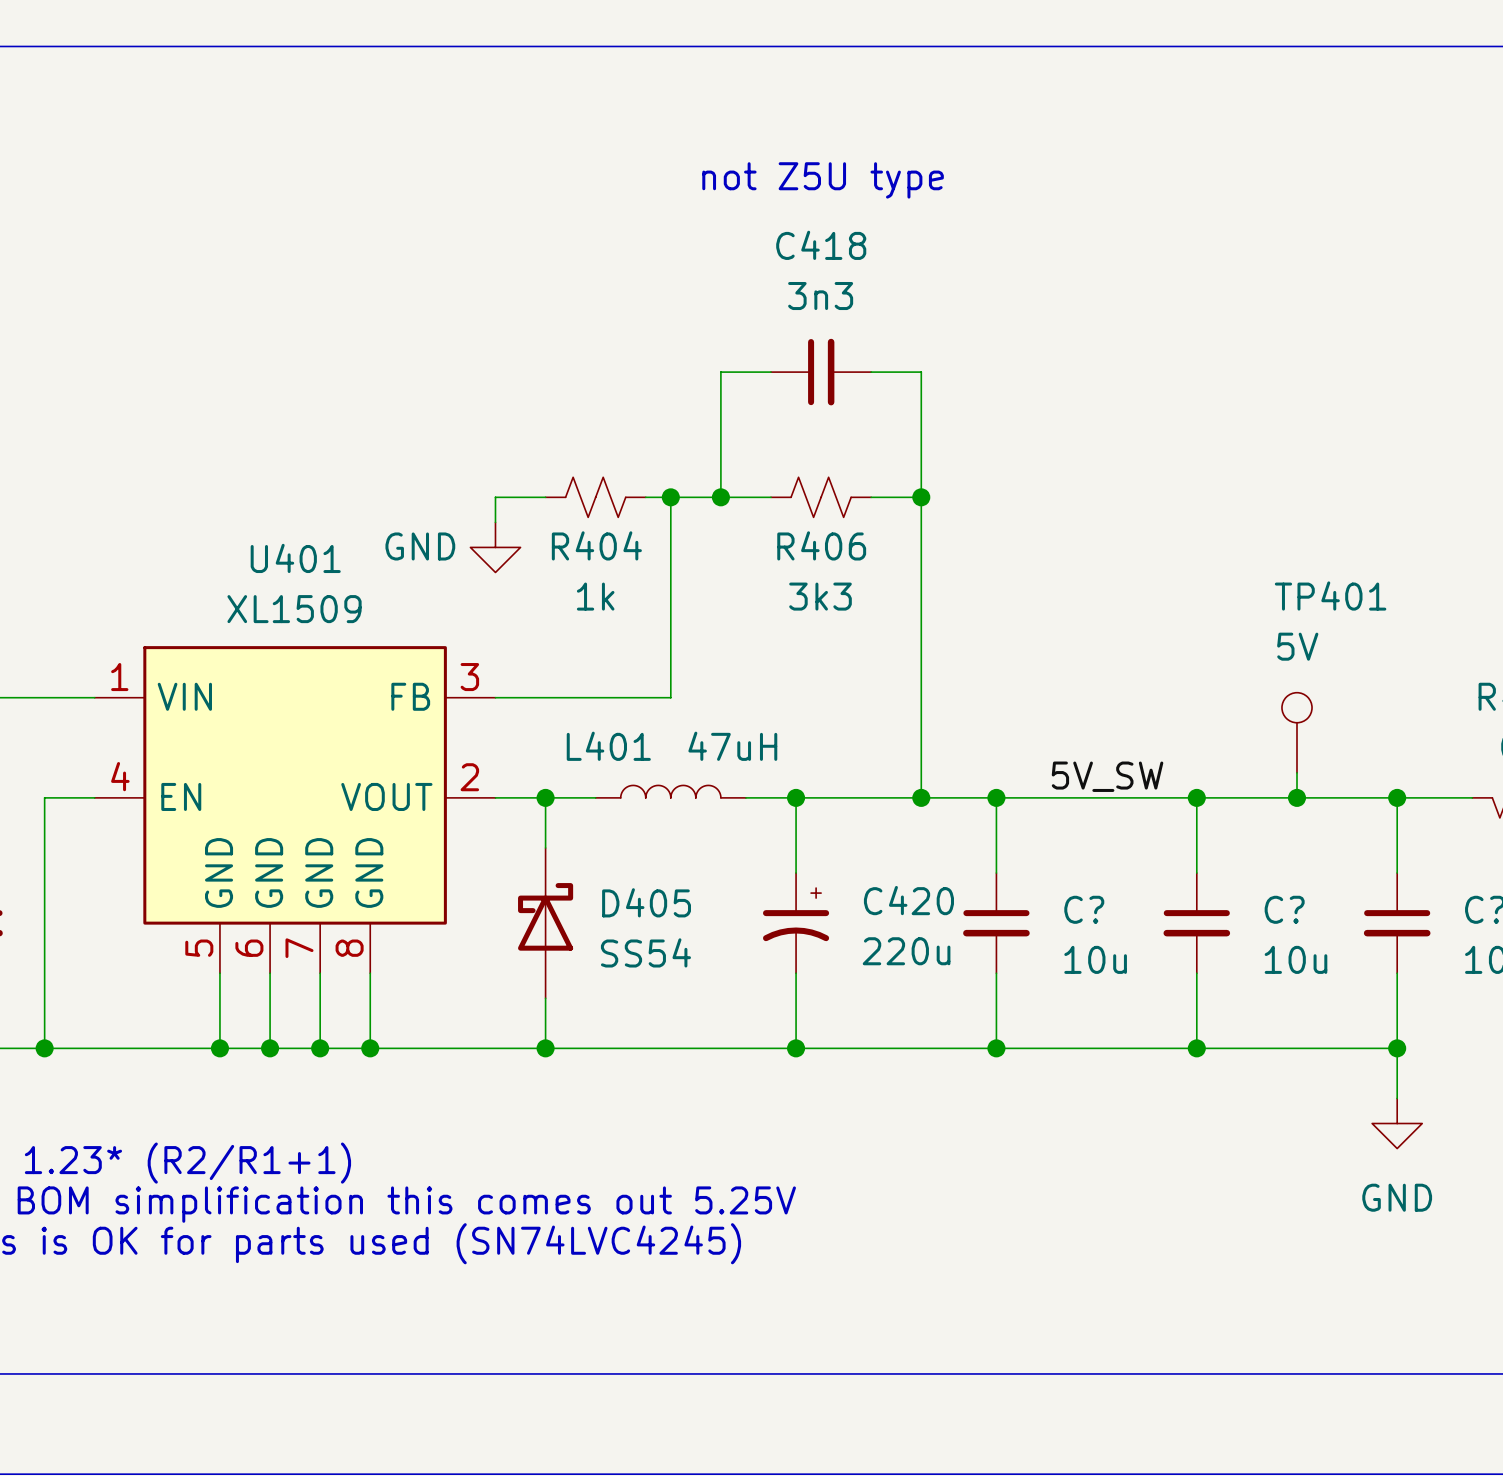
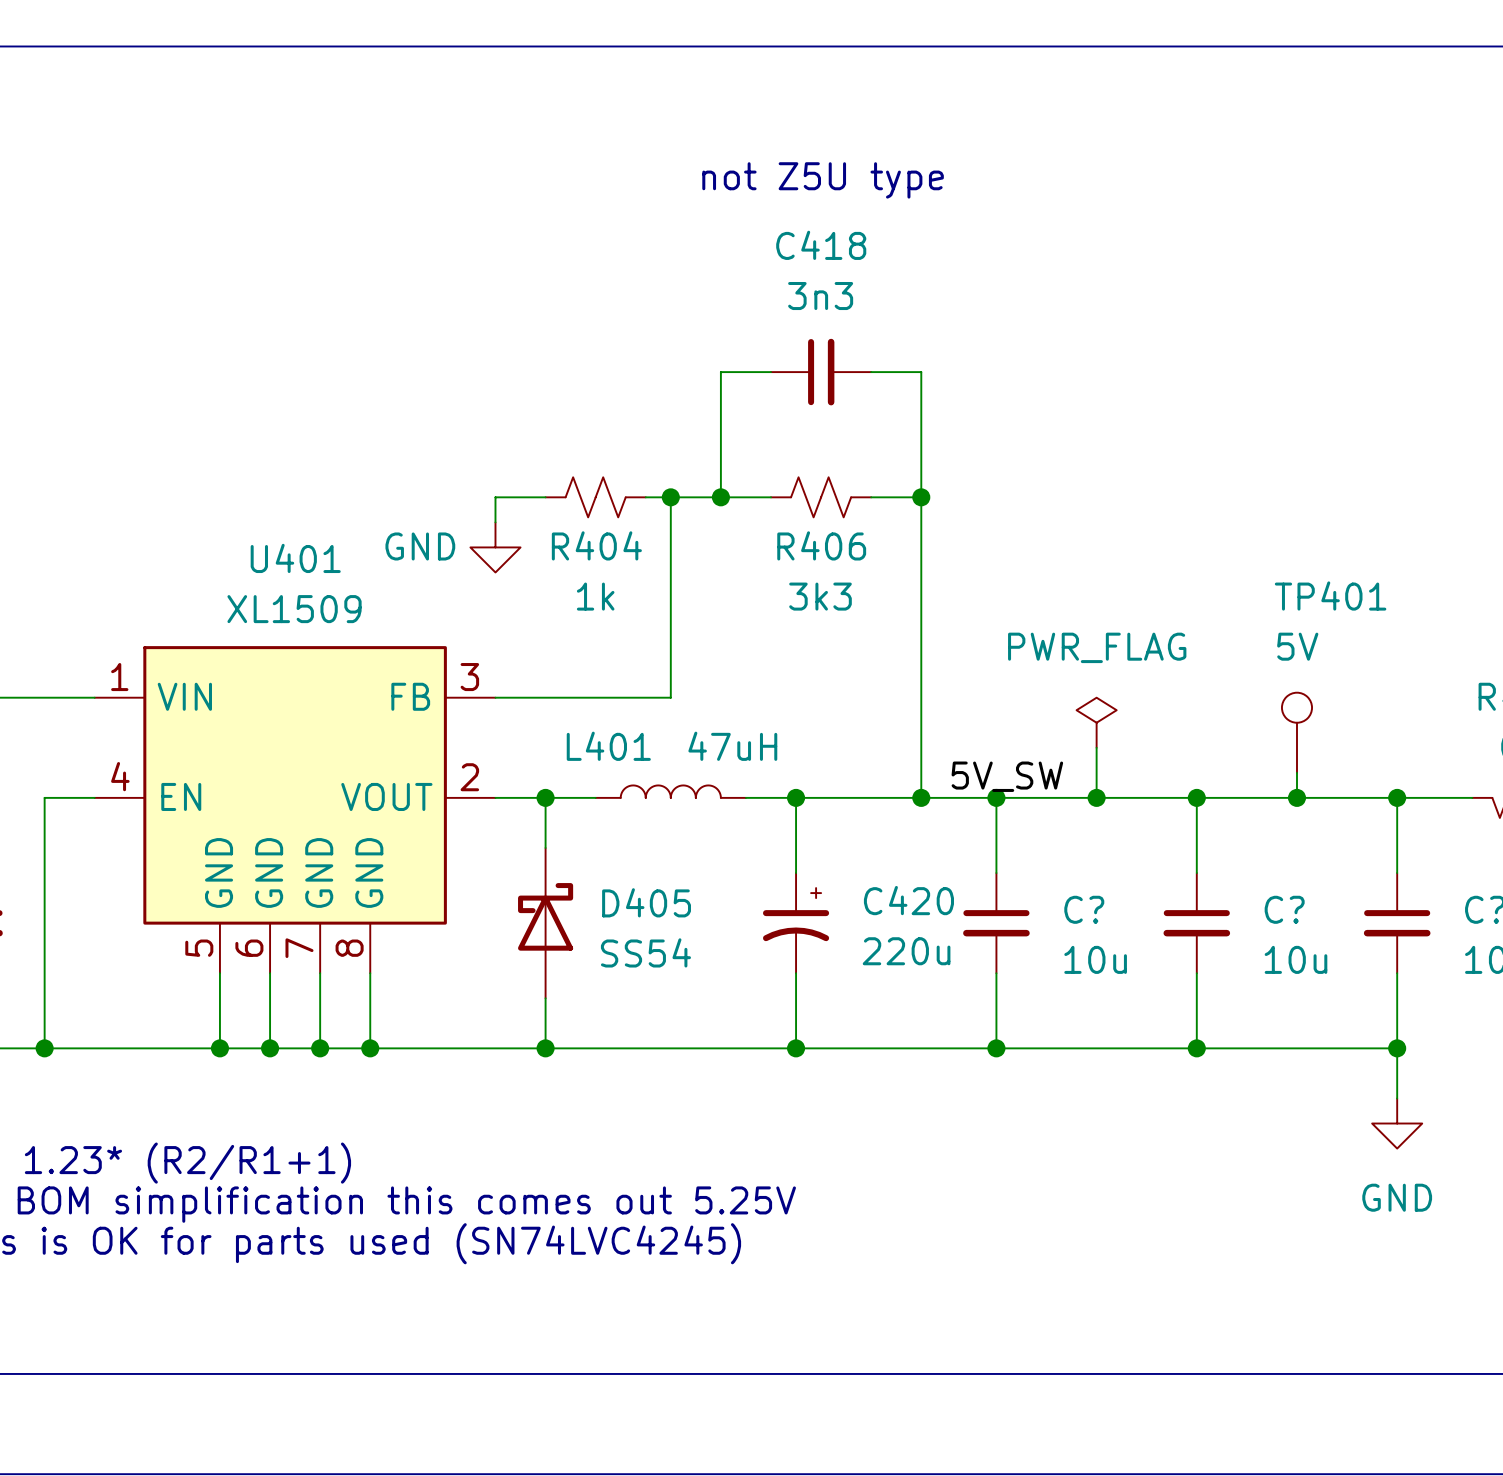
power symbol: none -> PWR_FLAG (1096, 722)
wire: none -> (1096, 747) (1096, 797)
label position: 5V_SW (1107, 776) -> 5V_SW (1007, 776)
junction: none -> (1096, 797)

